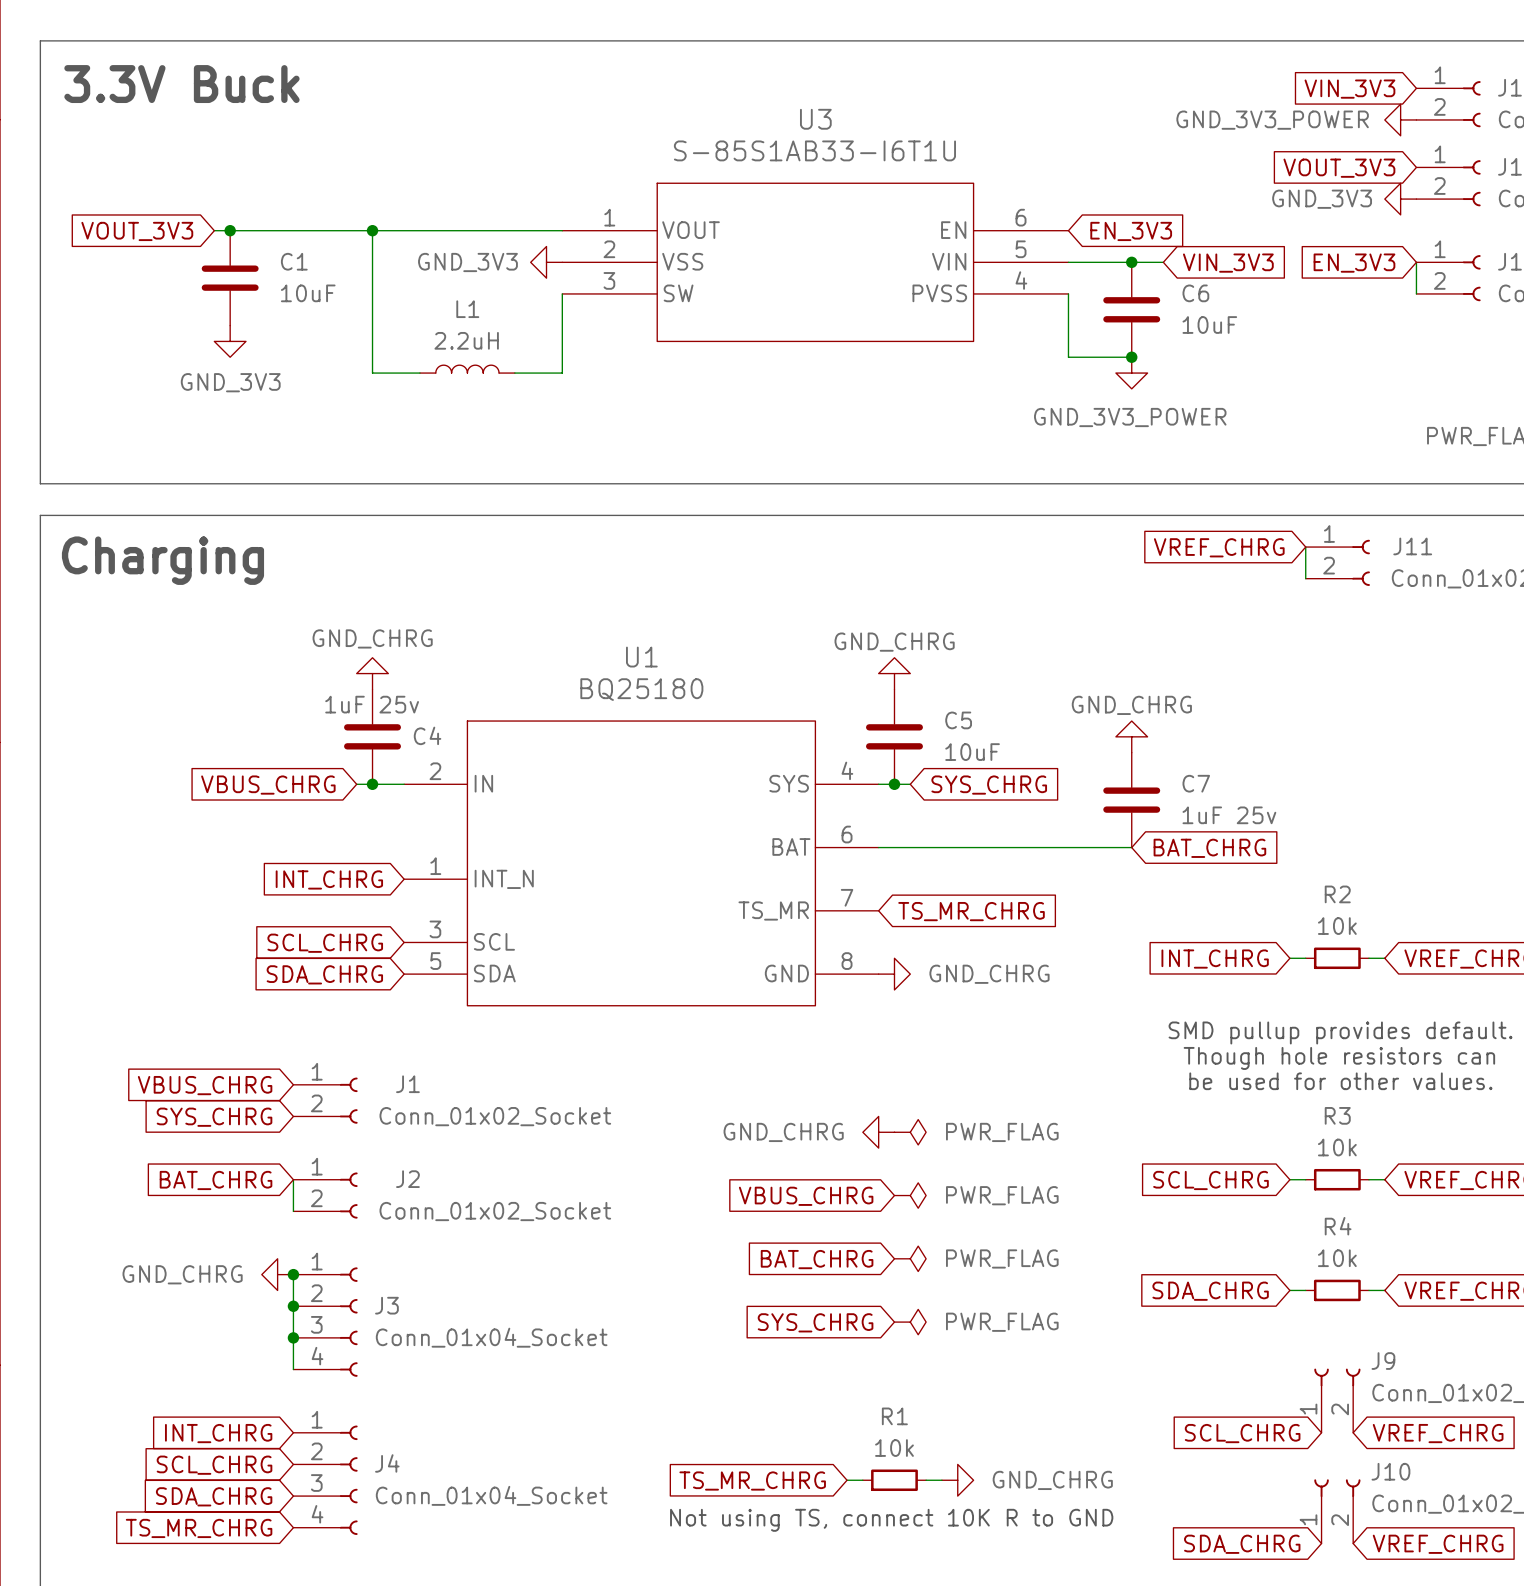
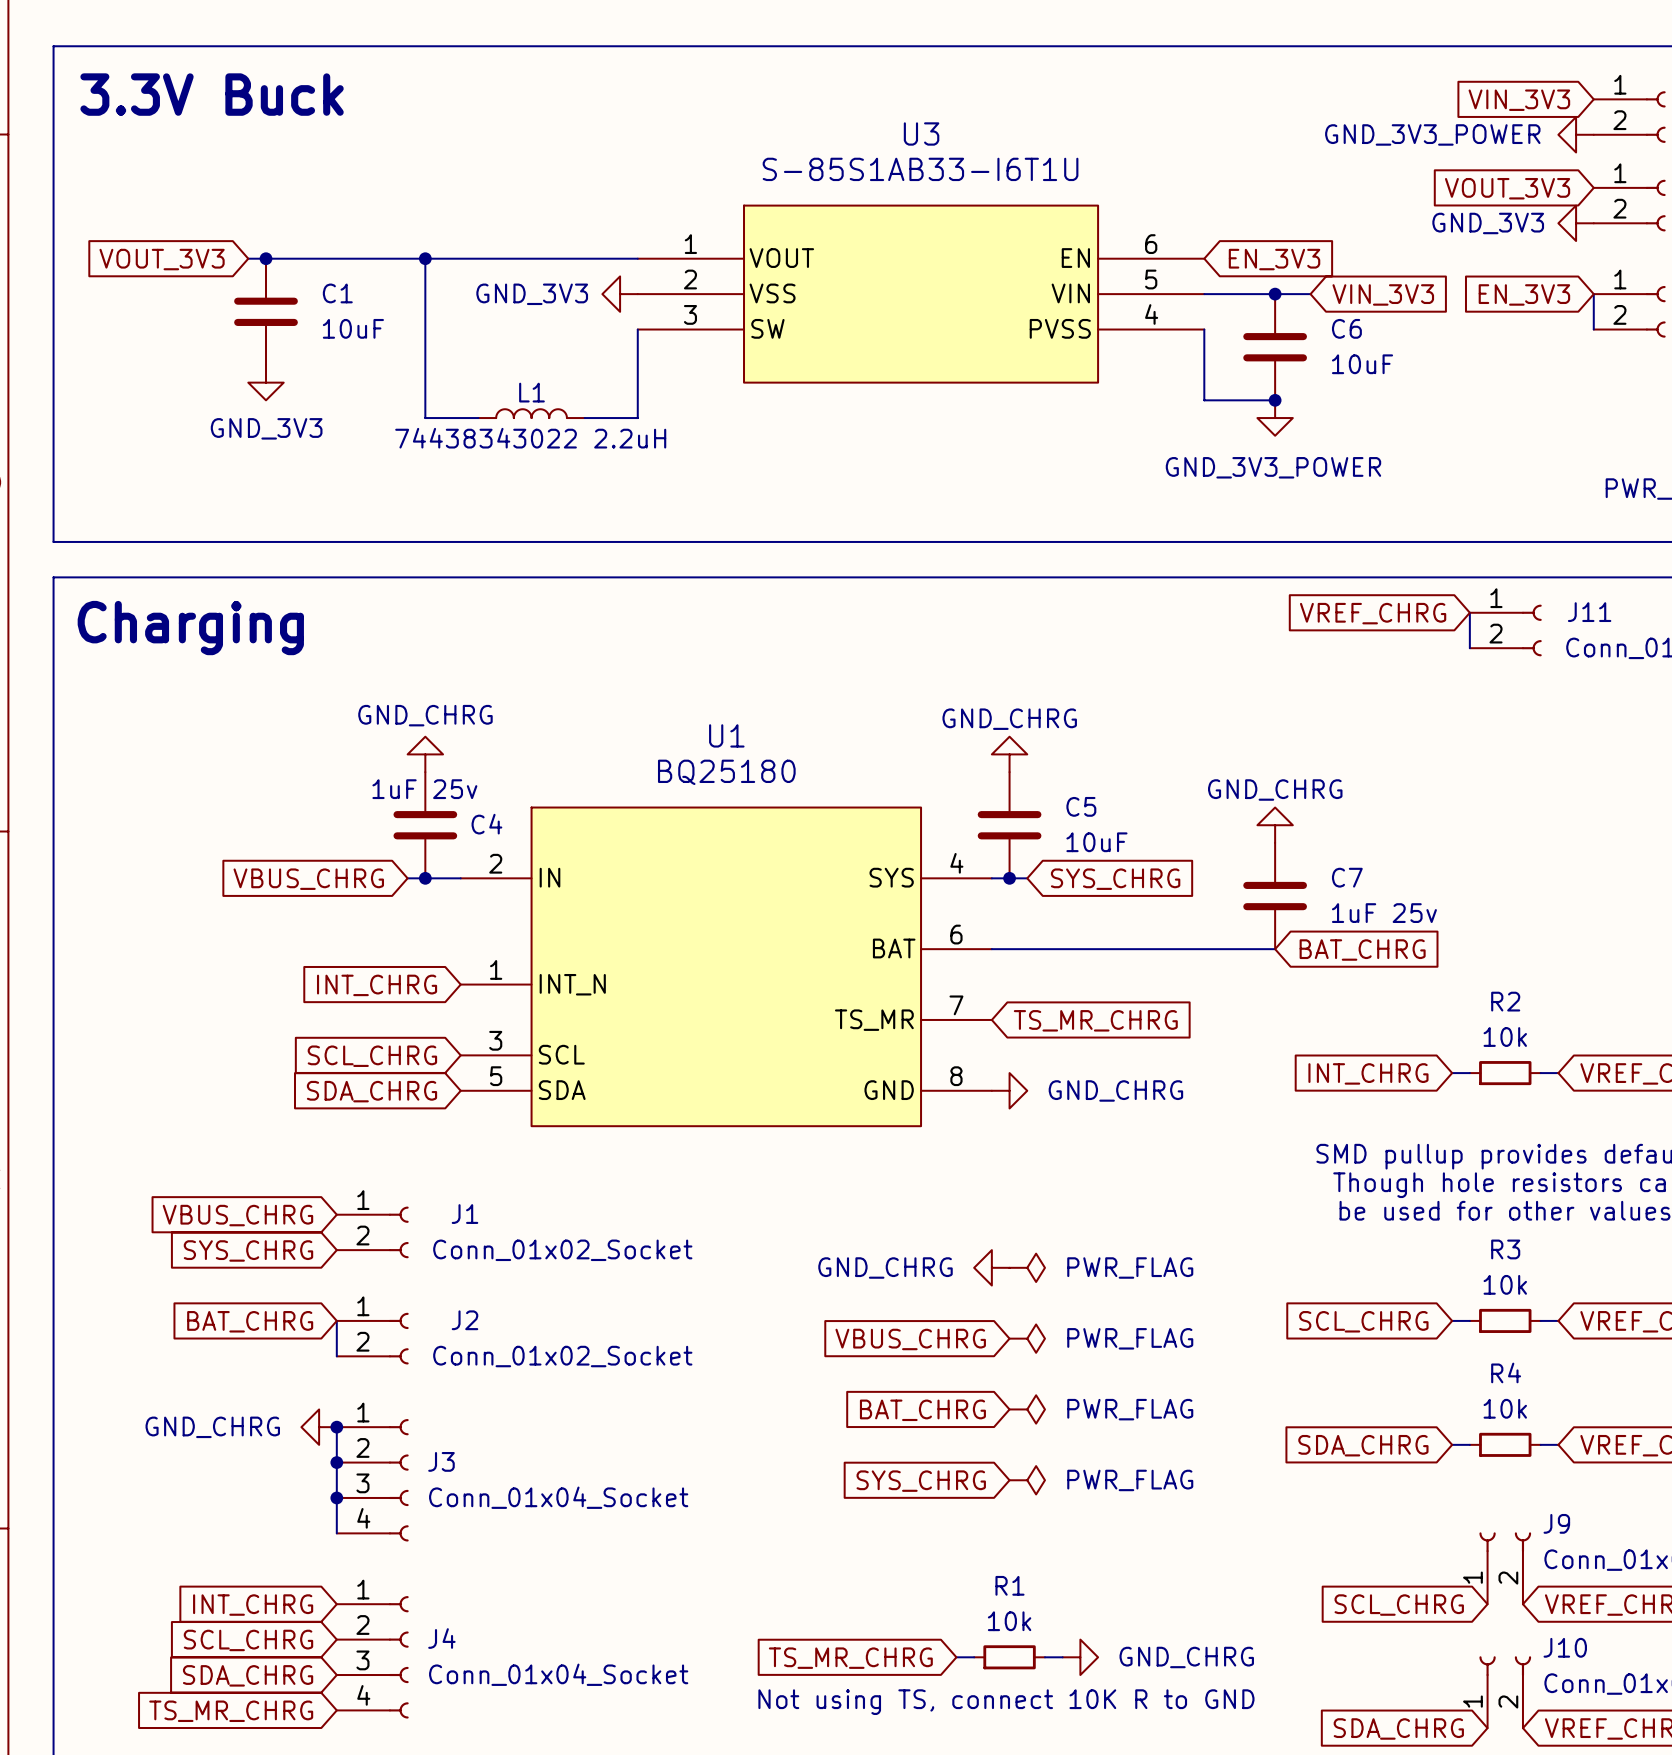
L1 name position: L1 (467, 309) -> L1 (531, 392)
L1 value: 2.2uH (466, 340) -> 74438343022 2.2uH (530, 438)

